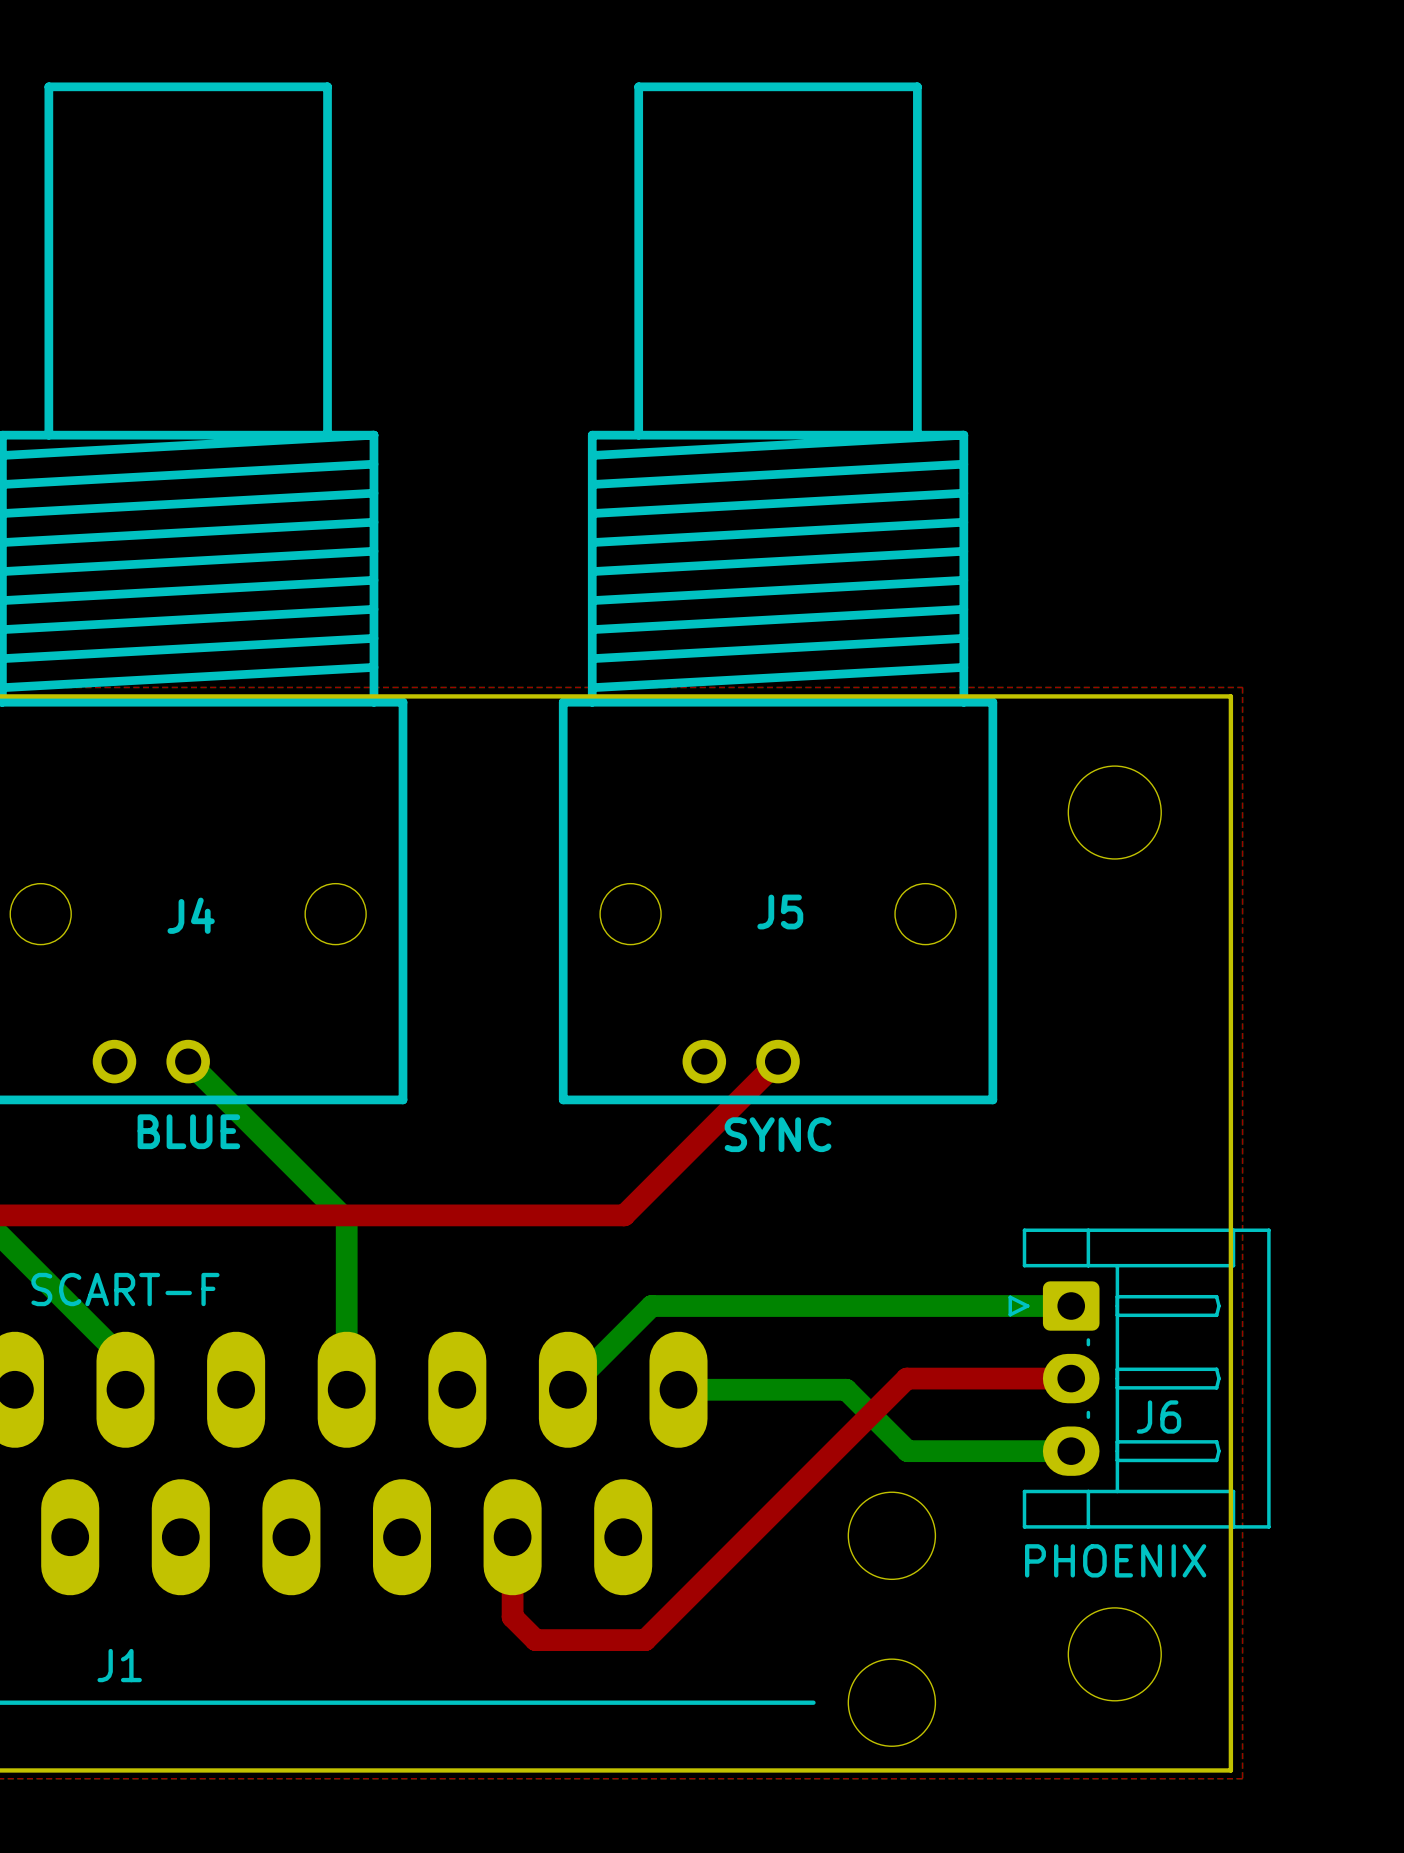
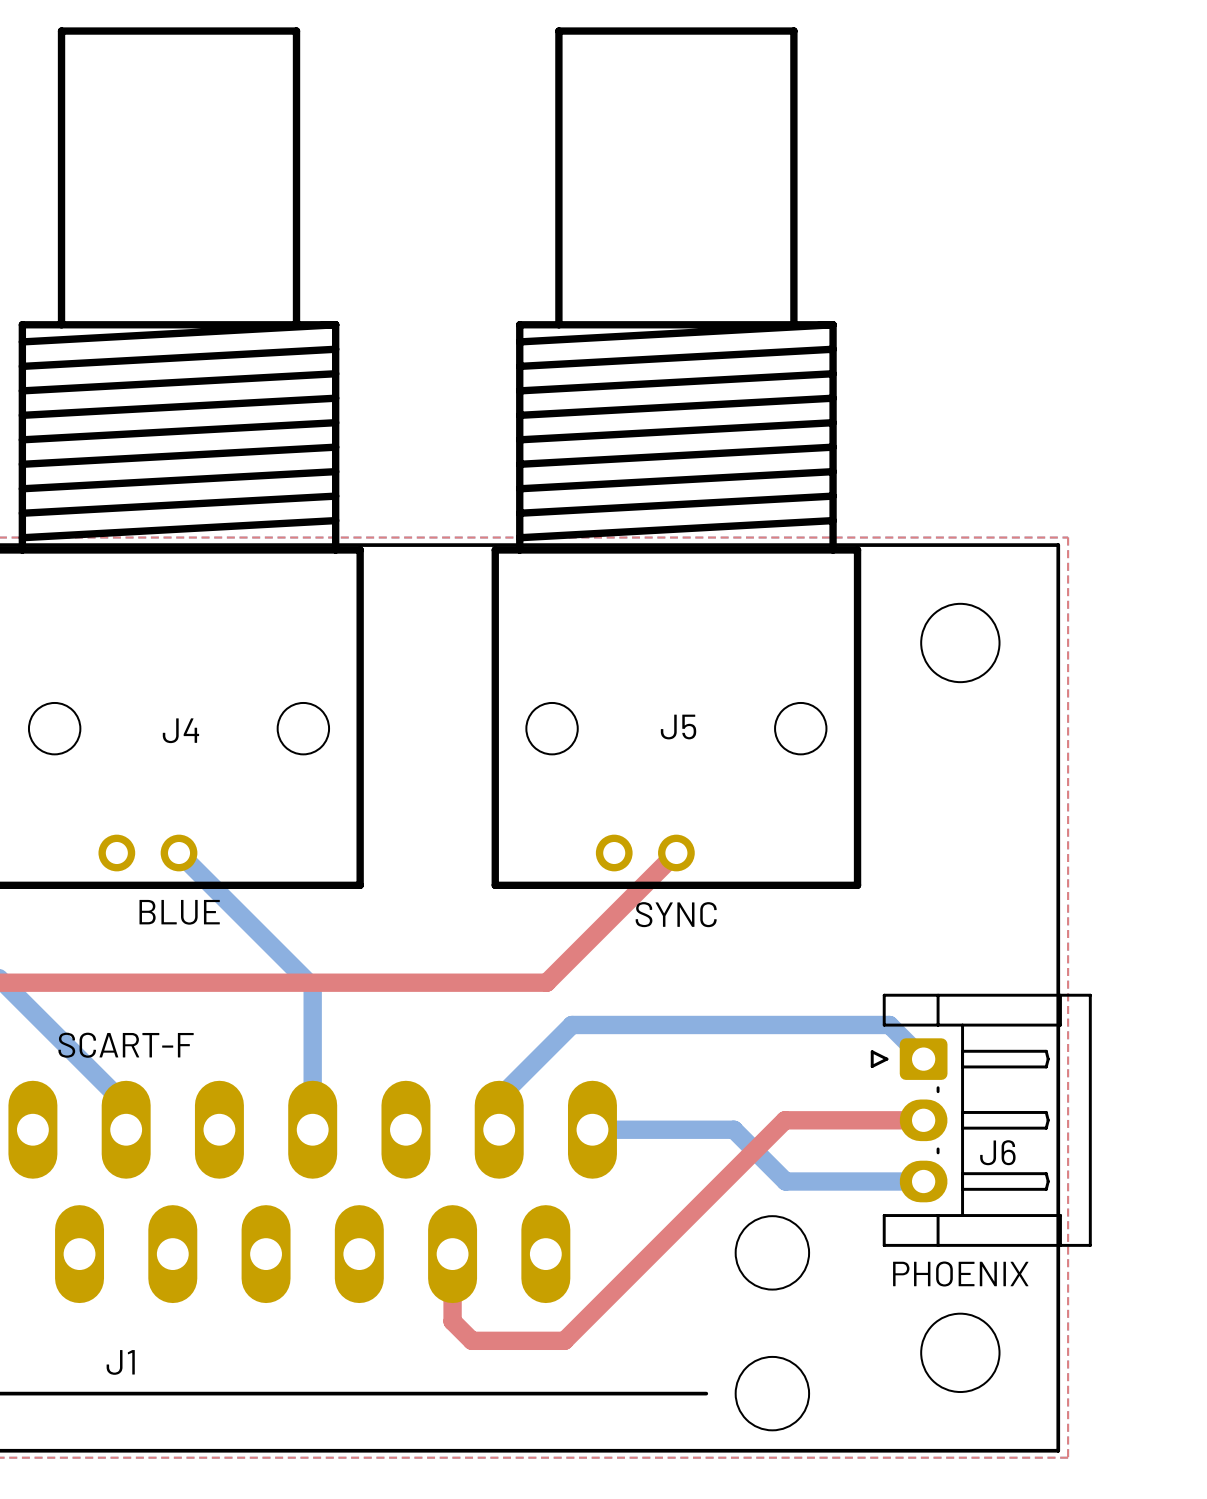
bottom track: (1071, 1306) (651, 1306) (567, 1389) -> (923, 1059) (889, 1024) (571, 1024) (499, 1097) (499, 1129)

